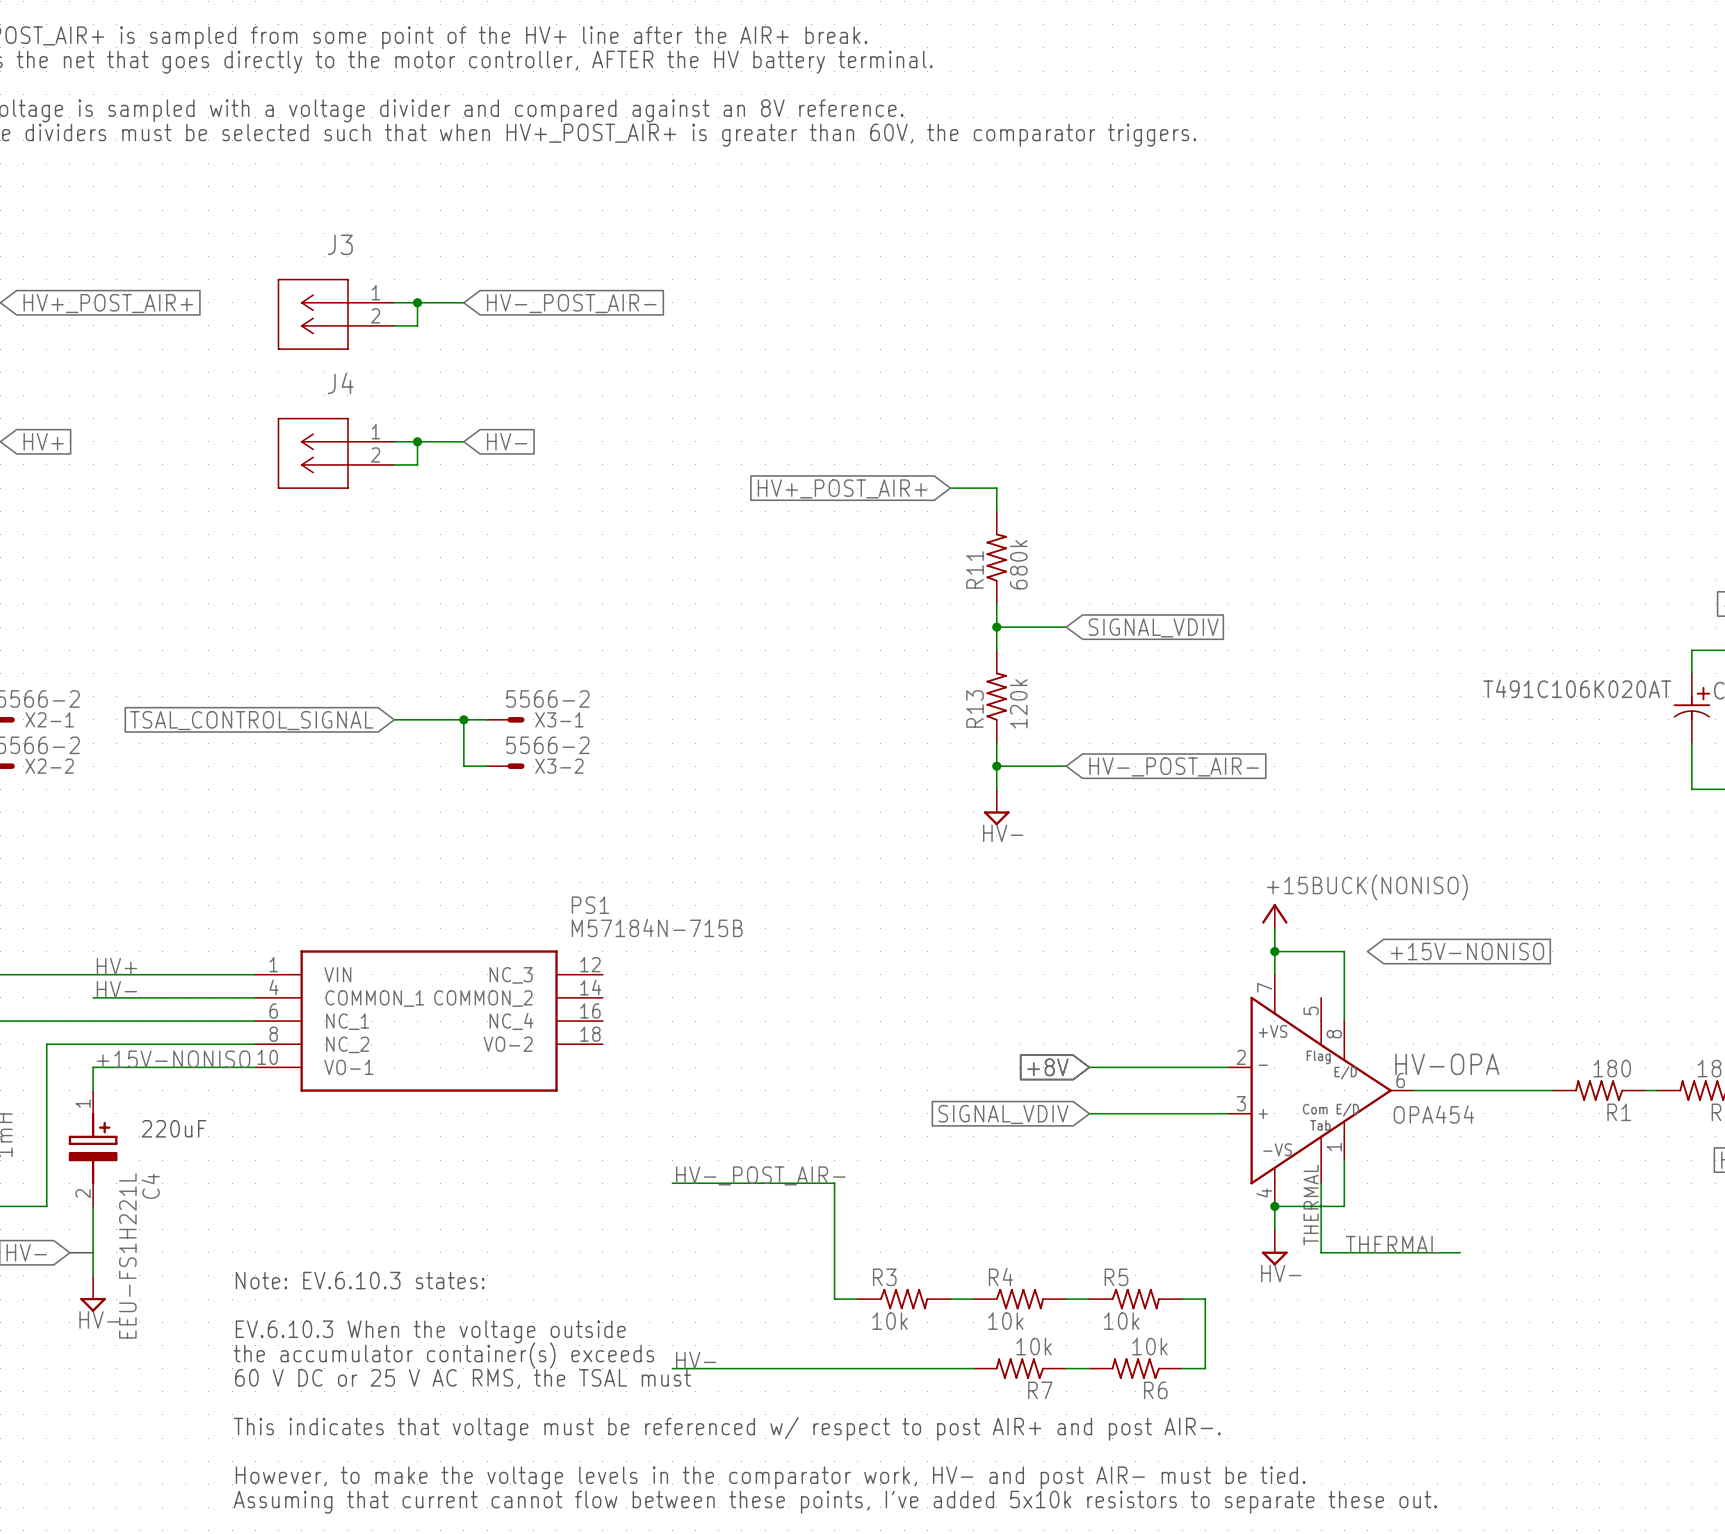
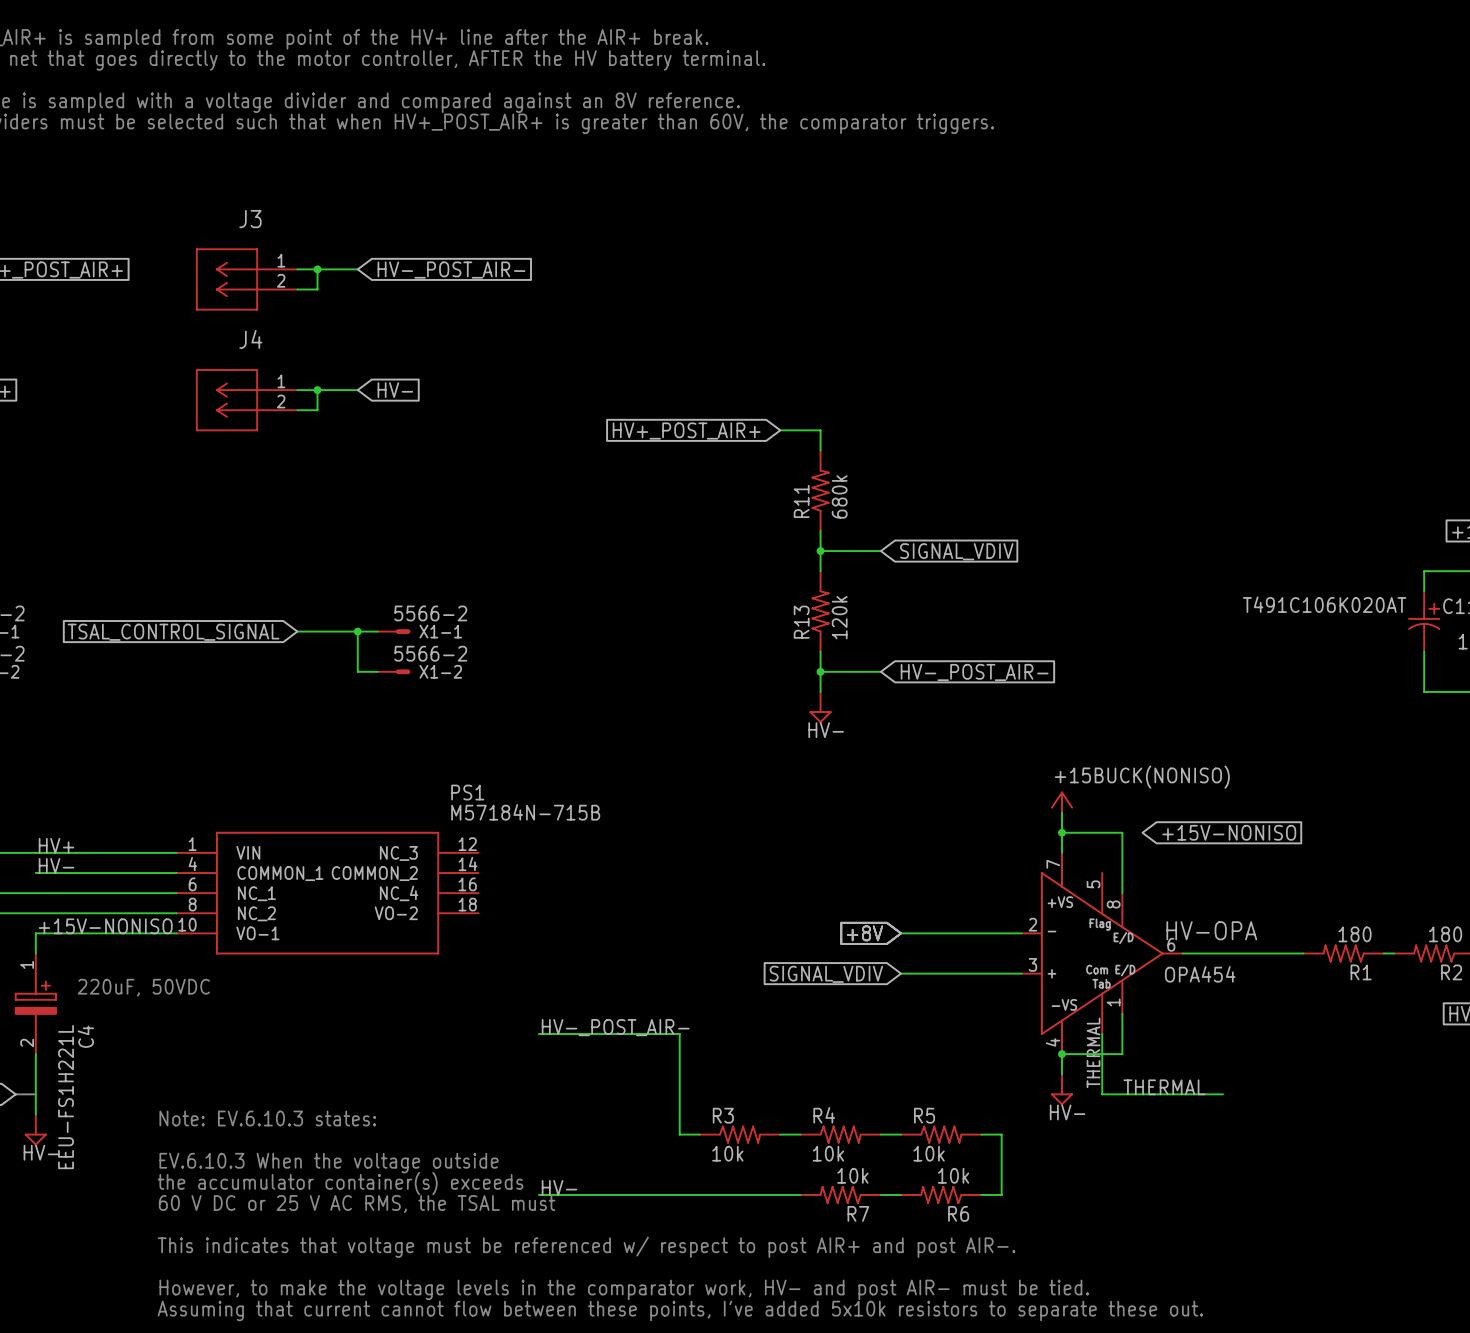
X3-1 name: X3-1 (559, 719) -> X1-1 (440, 631)
X3-2 name: X3-2 (559, 766) -> X1-2 (440, 671)
text: 220uF (174, 1128) -> 220uF, 50VDC (143, 987)

